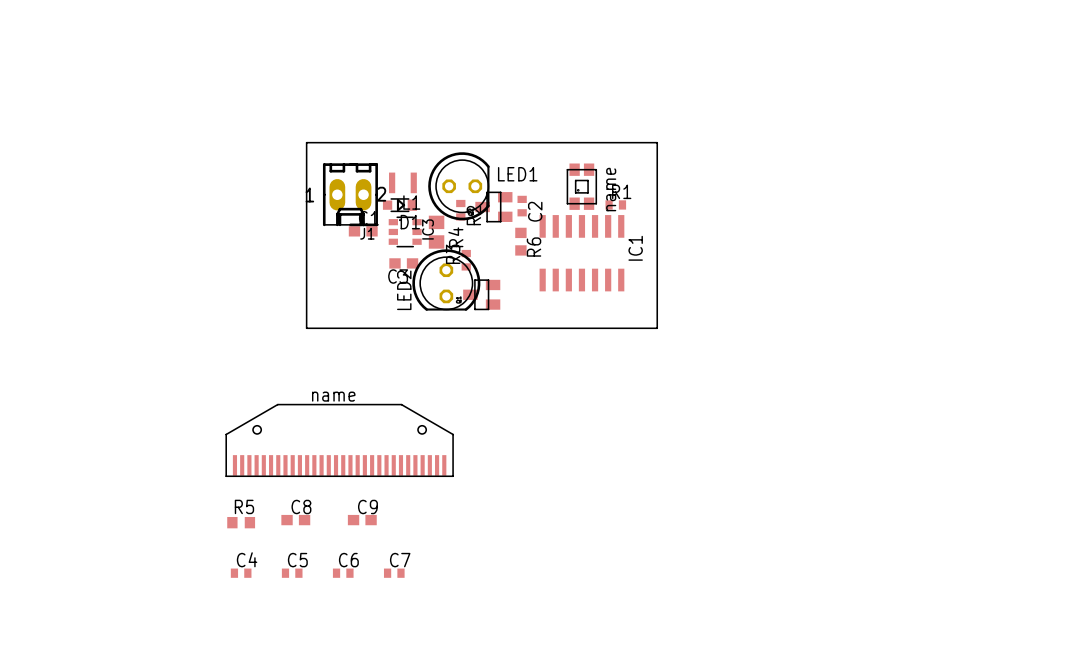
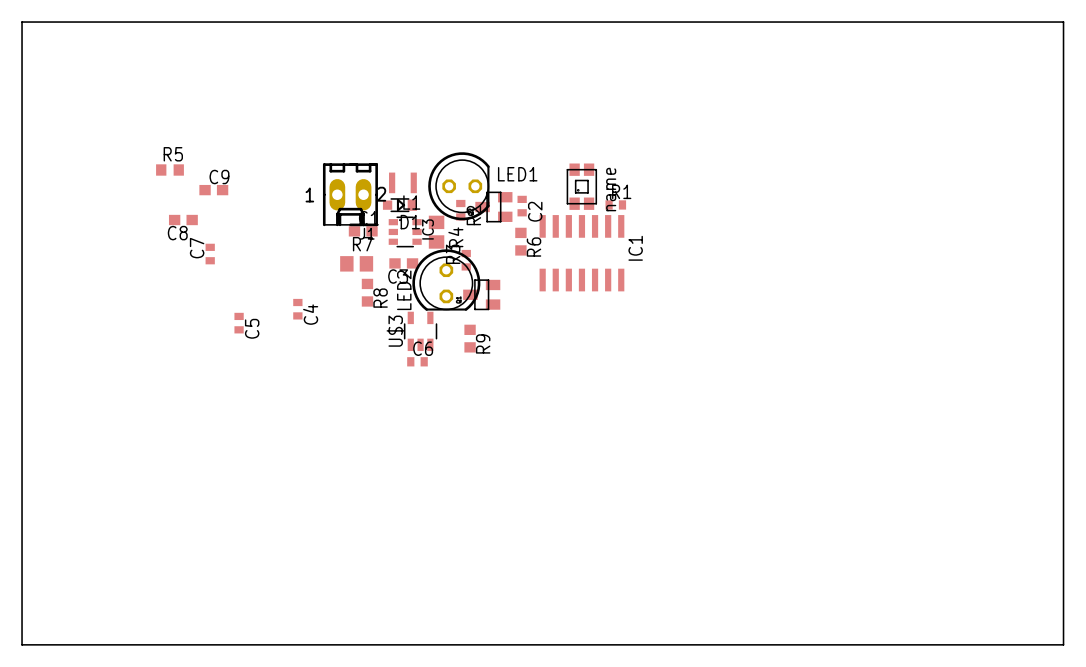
board edge: none -> (22, 22) (1063, 22) (1063, 644) (22, 644) (22, 22)
board edge: (306, 142) (657, 142) (657, 328) (306, 328) (306, 142) -> none
R7: none -> (356, 263)
R8: none -> (367, 292)
U$3: none -> (420, 331)
R9: none -> (470, 338)
part: (339, 440) -> none
C8 name position: C8 (301, 506) -> C8 (177, 233)
C8 position: (295, 520) -> (183, 220)
C9 position: (362, 520) -> (213, 190)
R5 position: (241, 522) -> (169, 169)
C7 name position: C7 (400, 560) -> C7 (197, 248)
C4 rotation: 0° (241, 573) -> 90° clockwise (297, 309)
C4 position: (241, 573) -> (297, 309)
C5 rotation: 0° (292, 573) -> 90° clockwise (239, 323)
C5 position: (292, 573) -> (239, 323)
C6 position: (343, 573) -> (417, 361)
C7 rotation: 0° (394, 573) -> 90° clockwise (210, 254)
C7 position: (394, 573) -> (210, 254)

